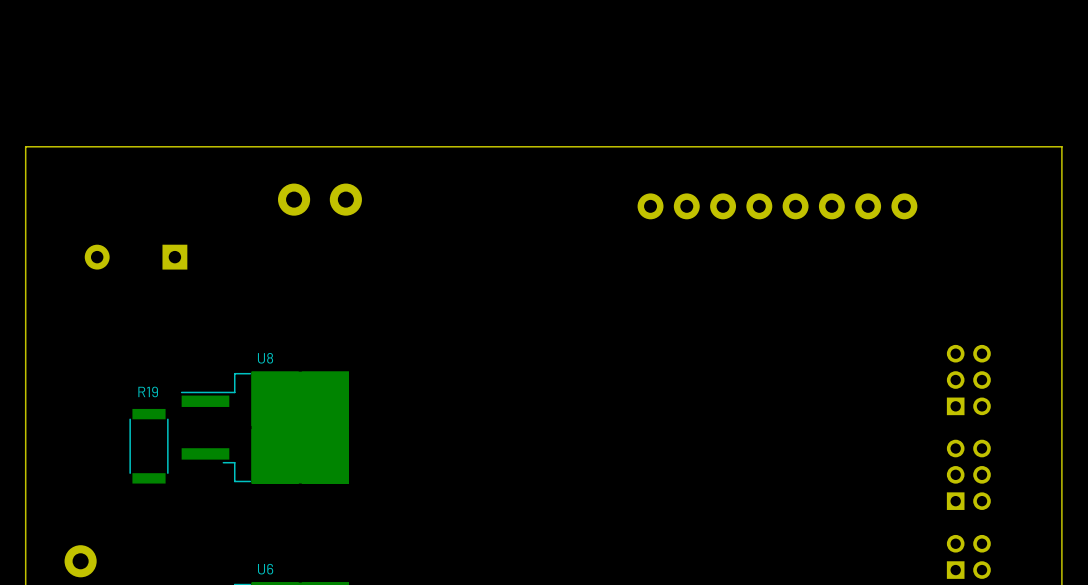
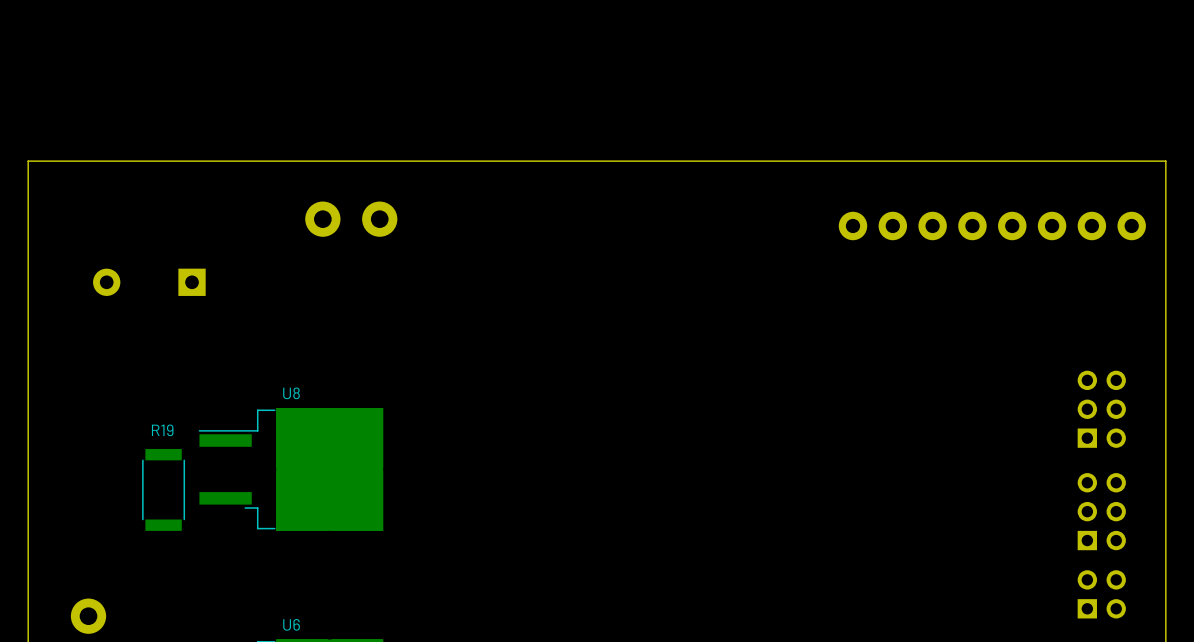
part position: (777, 206) -> (992, 225)
part position: (968, 380) -> (1101, 409)
part position: (968, 474) -> (1101, 511)
part position: (968, 556) -> (1101, 594)

